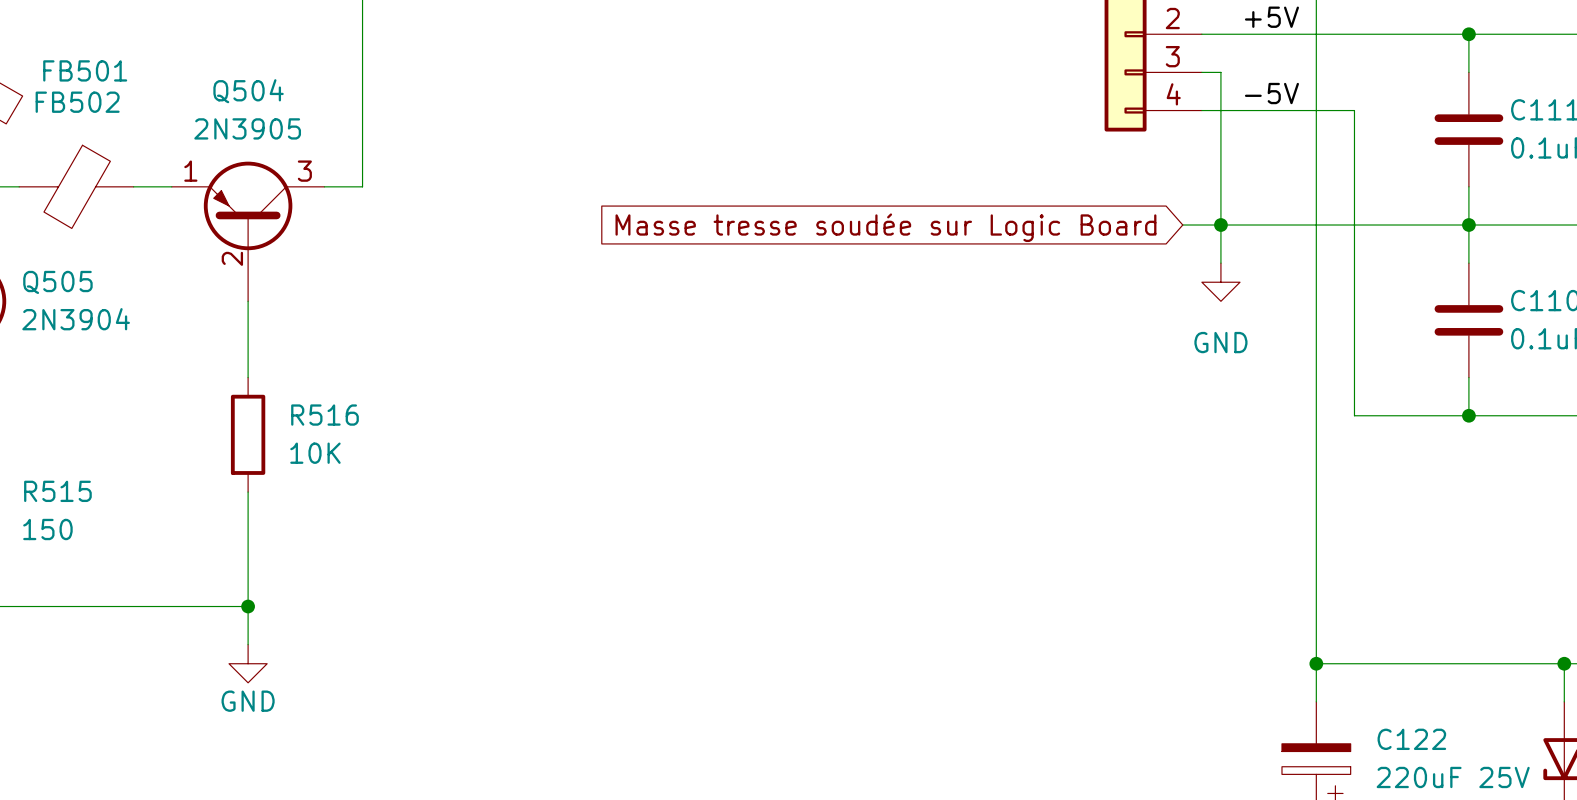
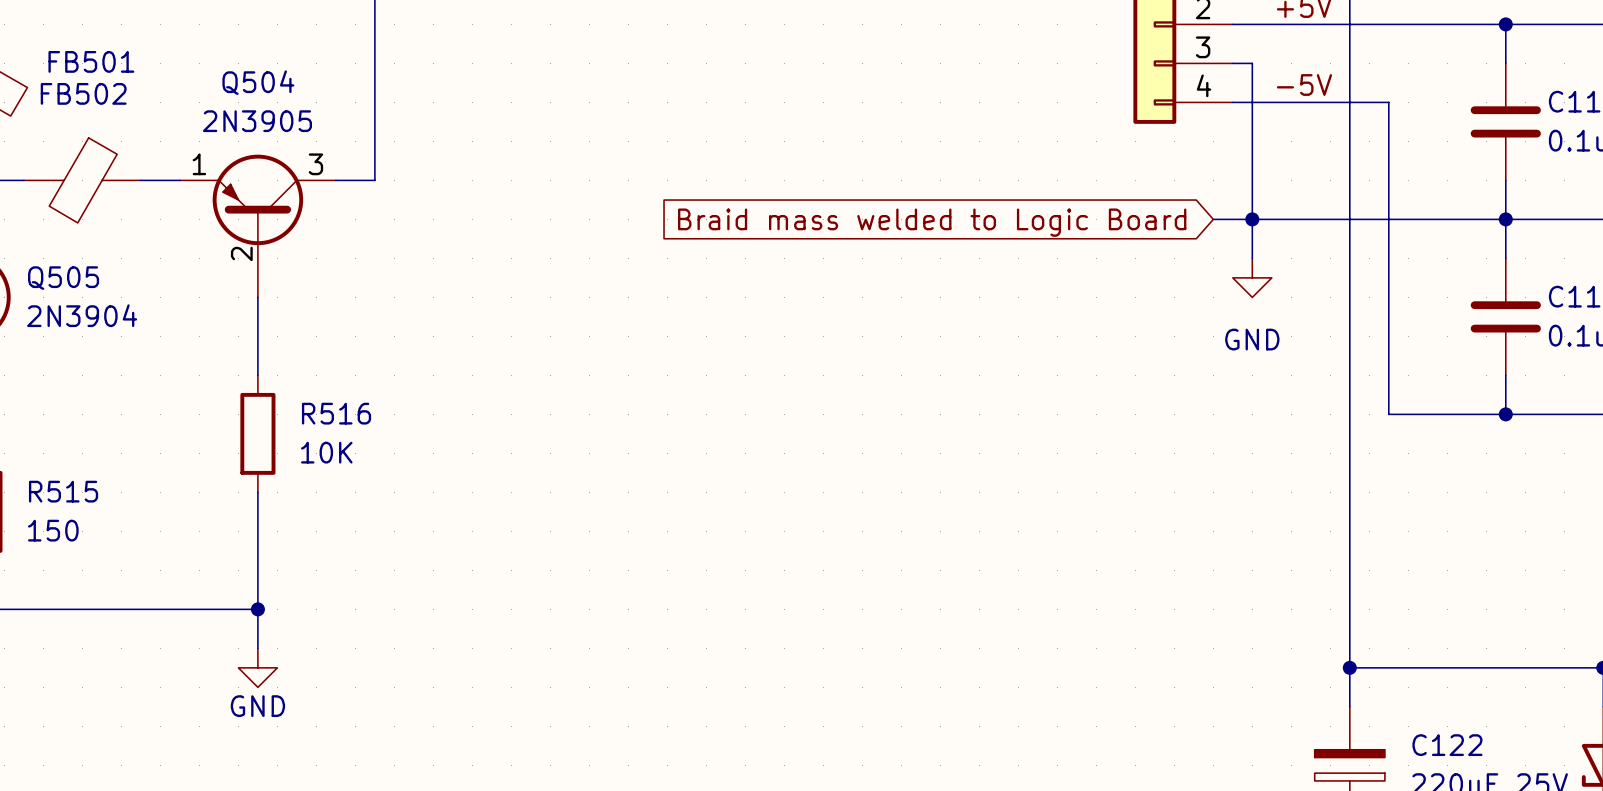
global label: Masse tresse soudée sur Logic Board (885, 227) -> Braid mass welded to Logic Board (932, 222)

